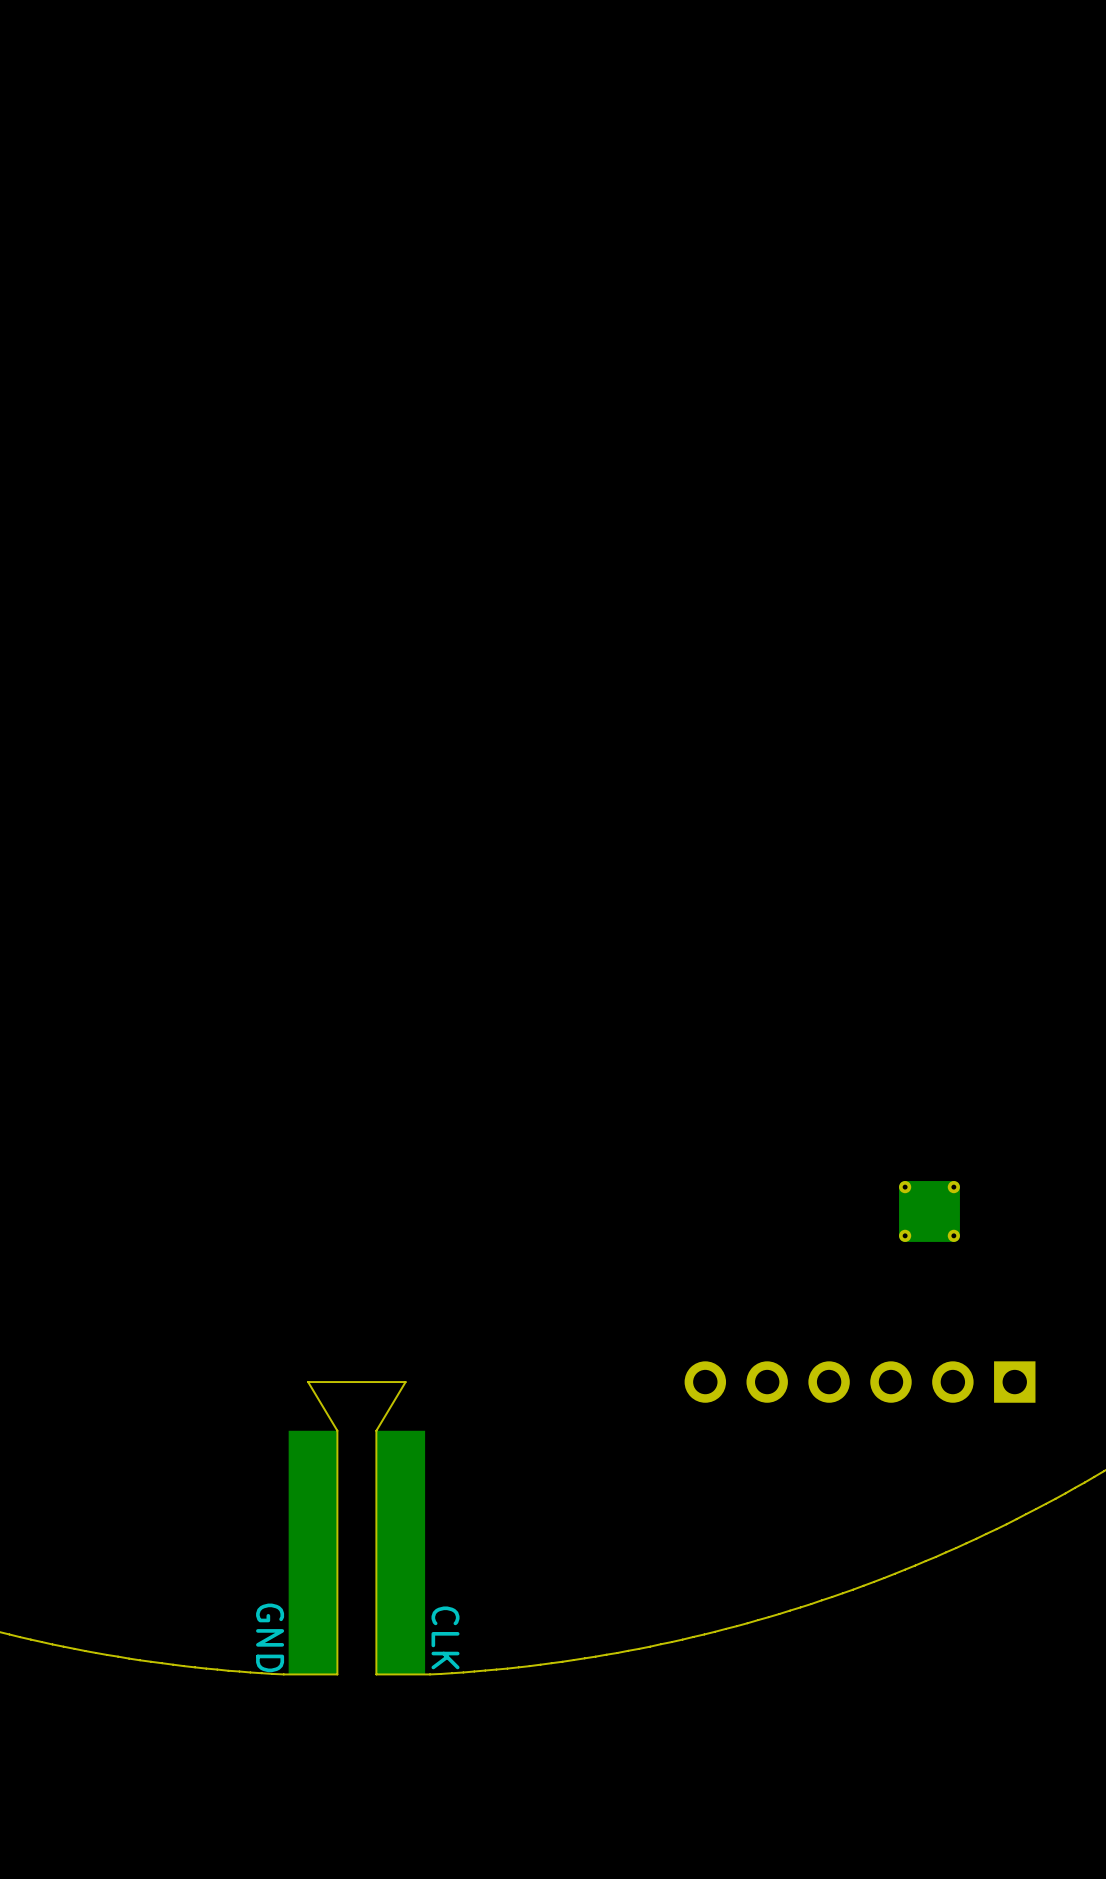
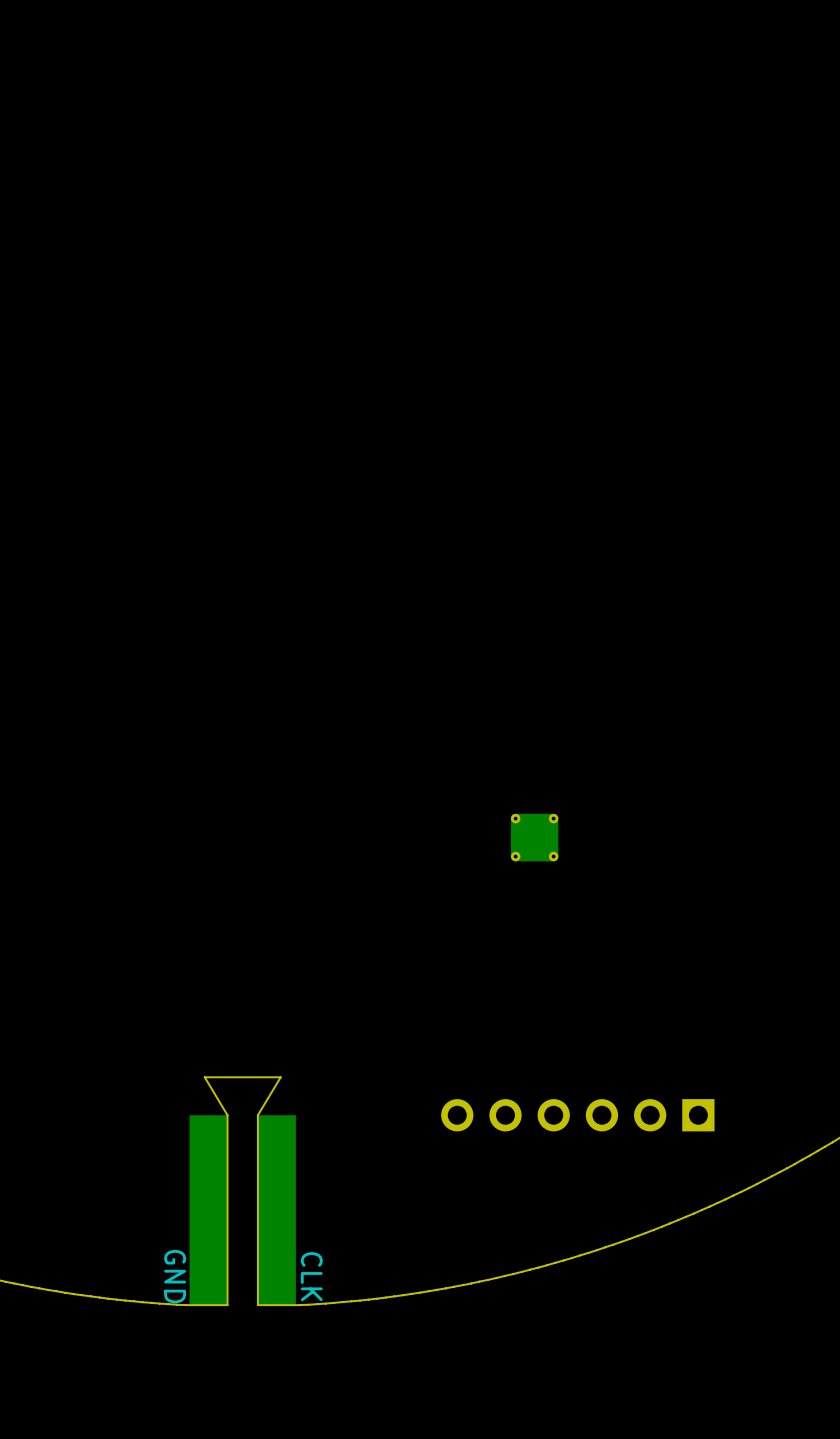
part position: (929, 1211) -> (534, 837)
part position: (860, 1382) -> (577, 1115)

